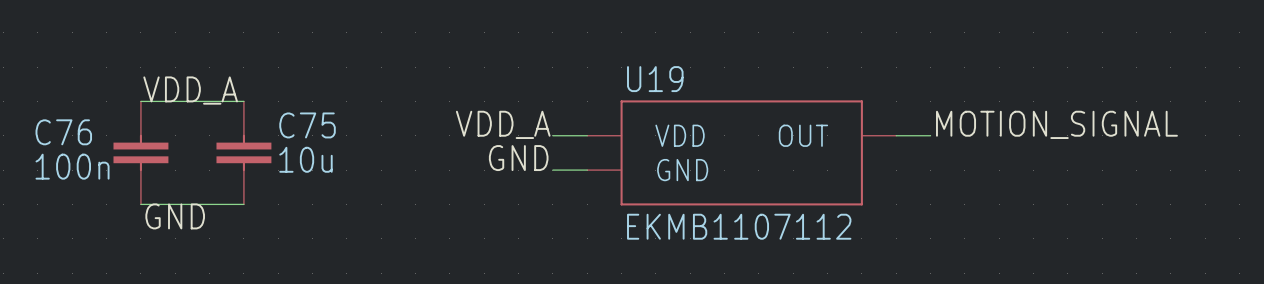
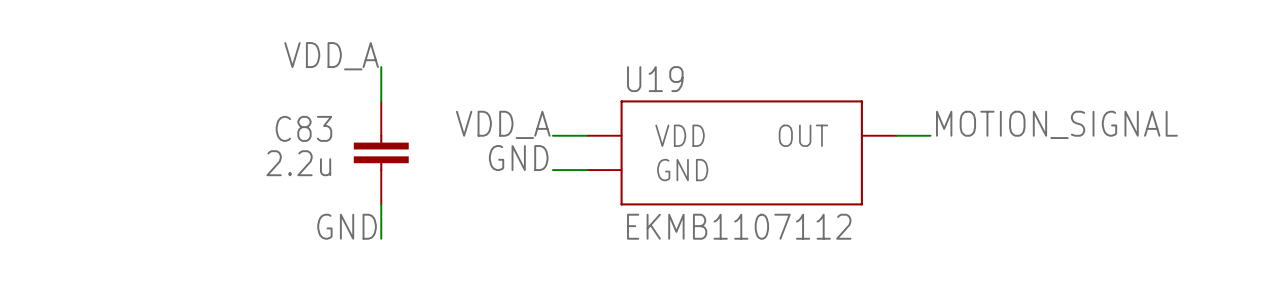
wire: none -> (381, 67) (381, 101)
label position: VDD_A (190, 90) -> VDD_A (331, 56)
wire: (140, 101) (243, 101) -> none
C76: 100n (140, 152) -> none
C75: 10u (243, 152) -> none
C83: none -> 2.2u (381, 152)
wire: (140, 204) (243, 204) -> none
wire: none -> (381, 204) (381, 238)
label position: GND (175, 216) -> GND (347, 226)

